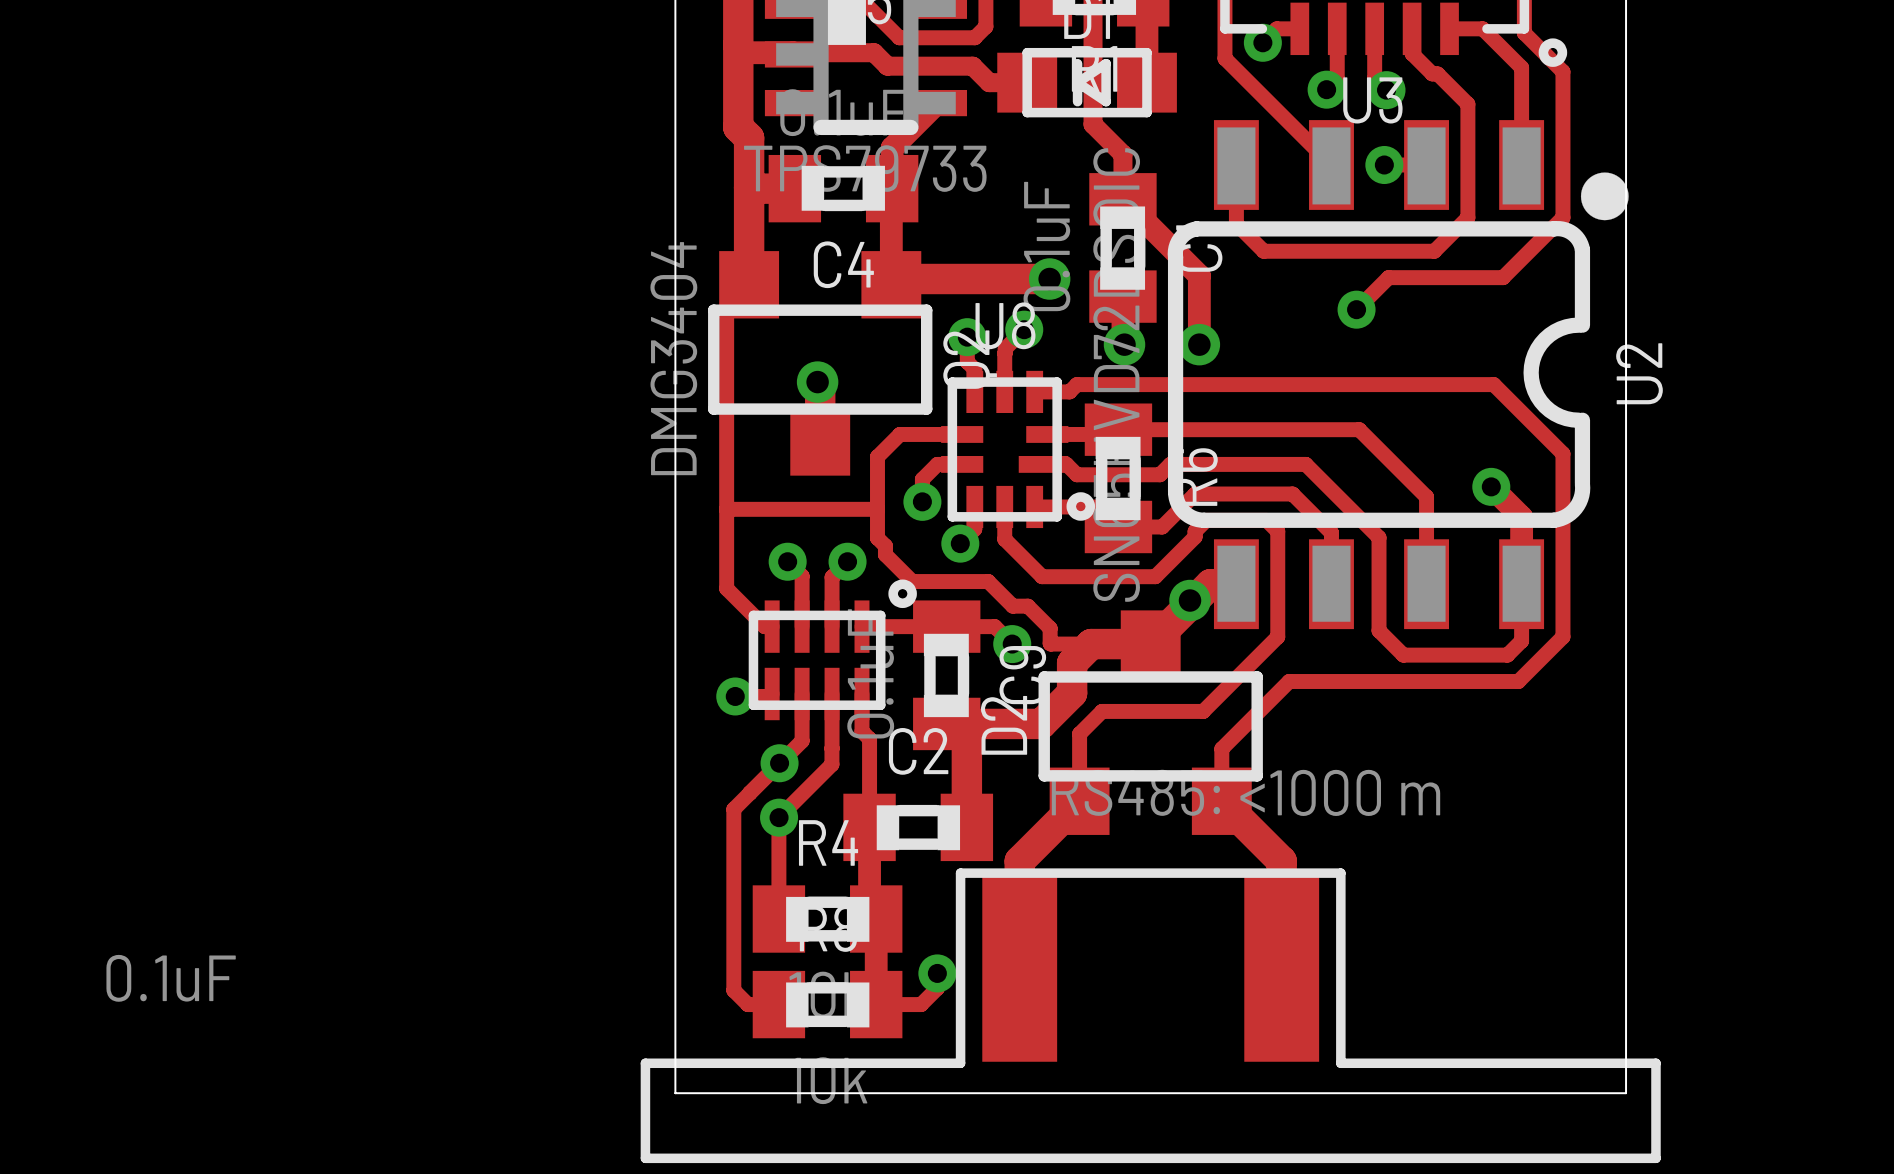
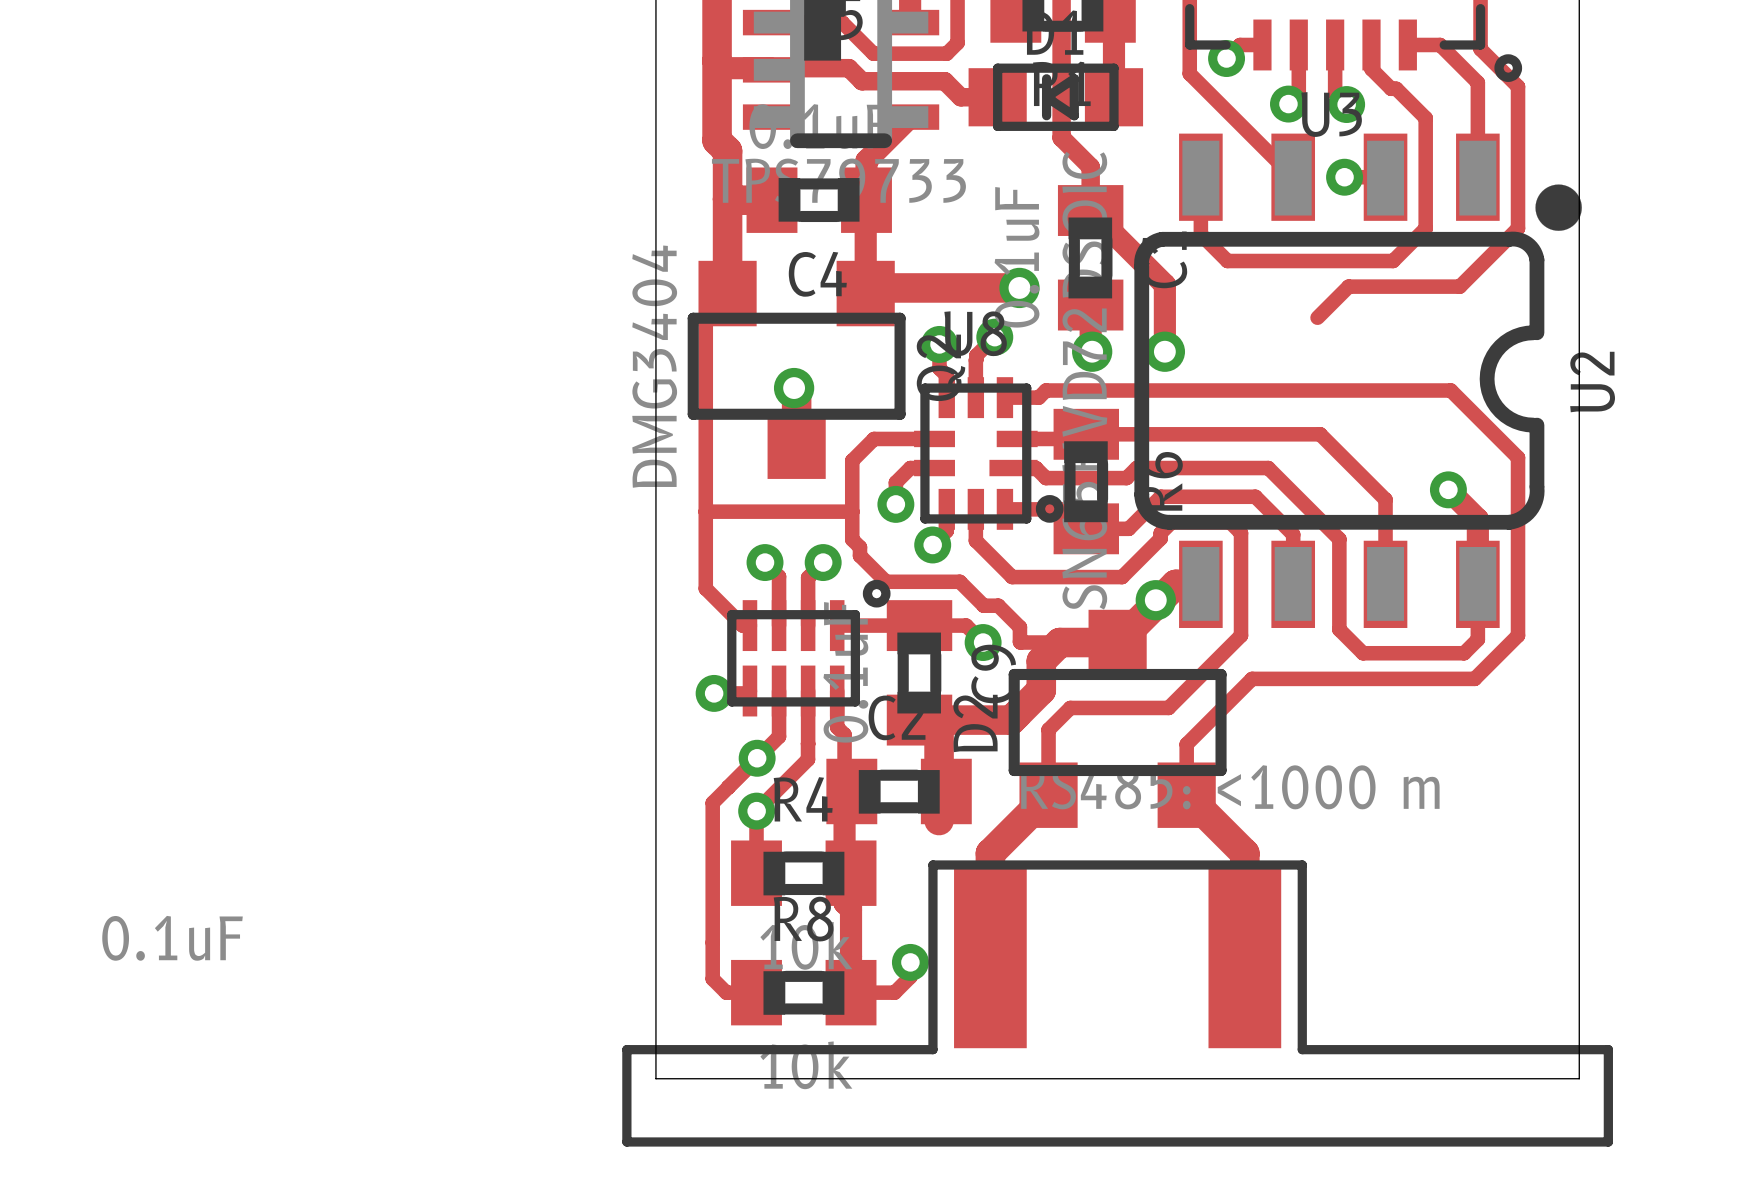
via: (1356, 309) -> none
C2 position: (918, 827) -> (899, 791)
R4 position: (827, 919) -> (803, 873)

